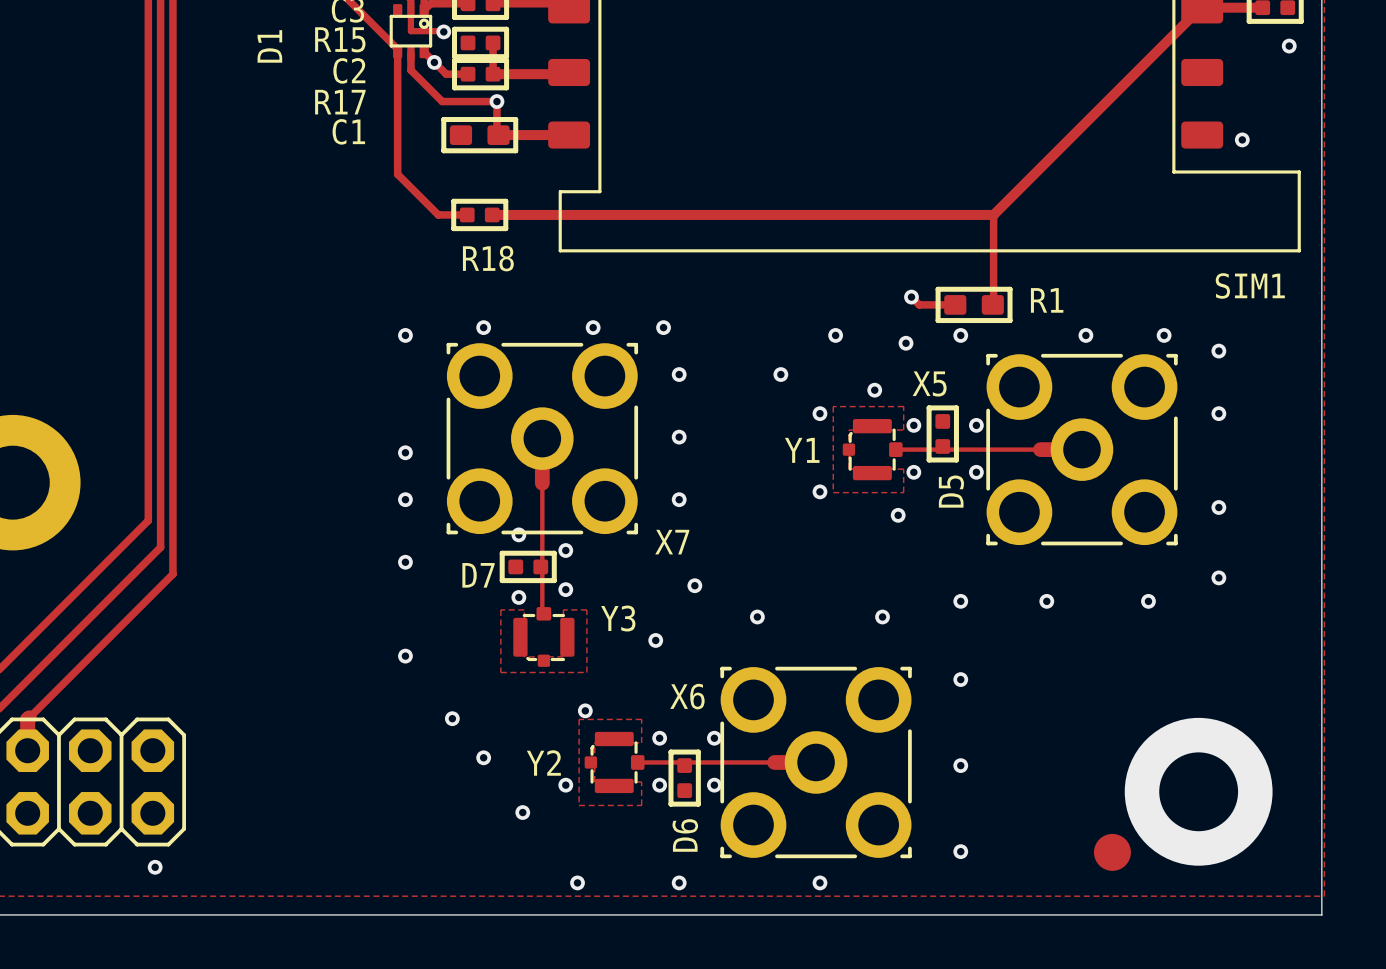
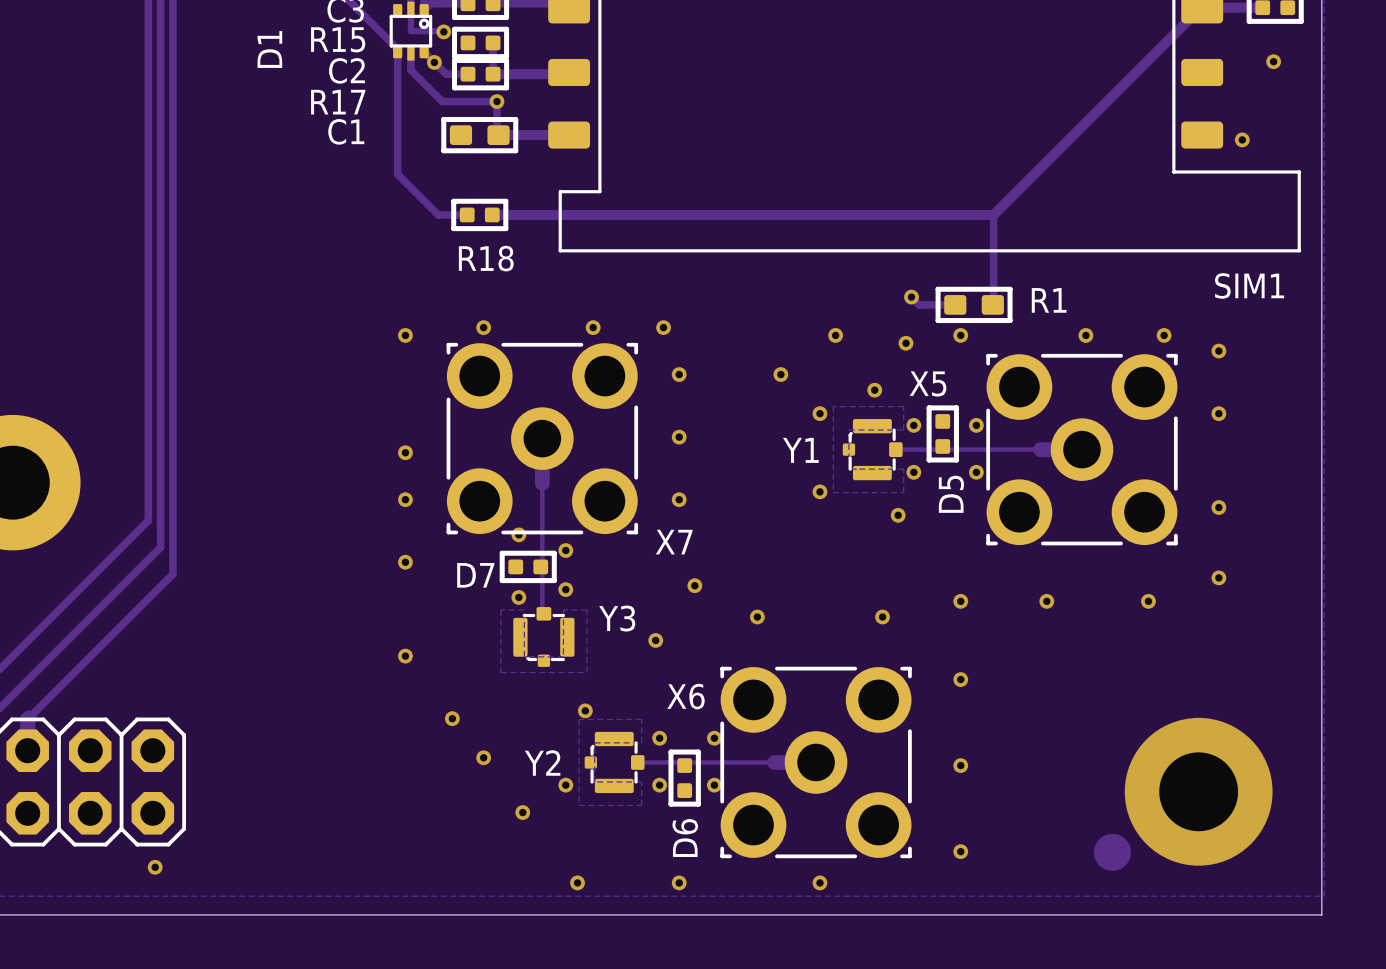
via position: (1289, 46) -> (1273, 61)

